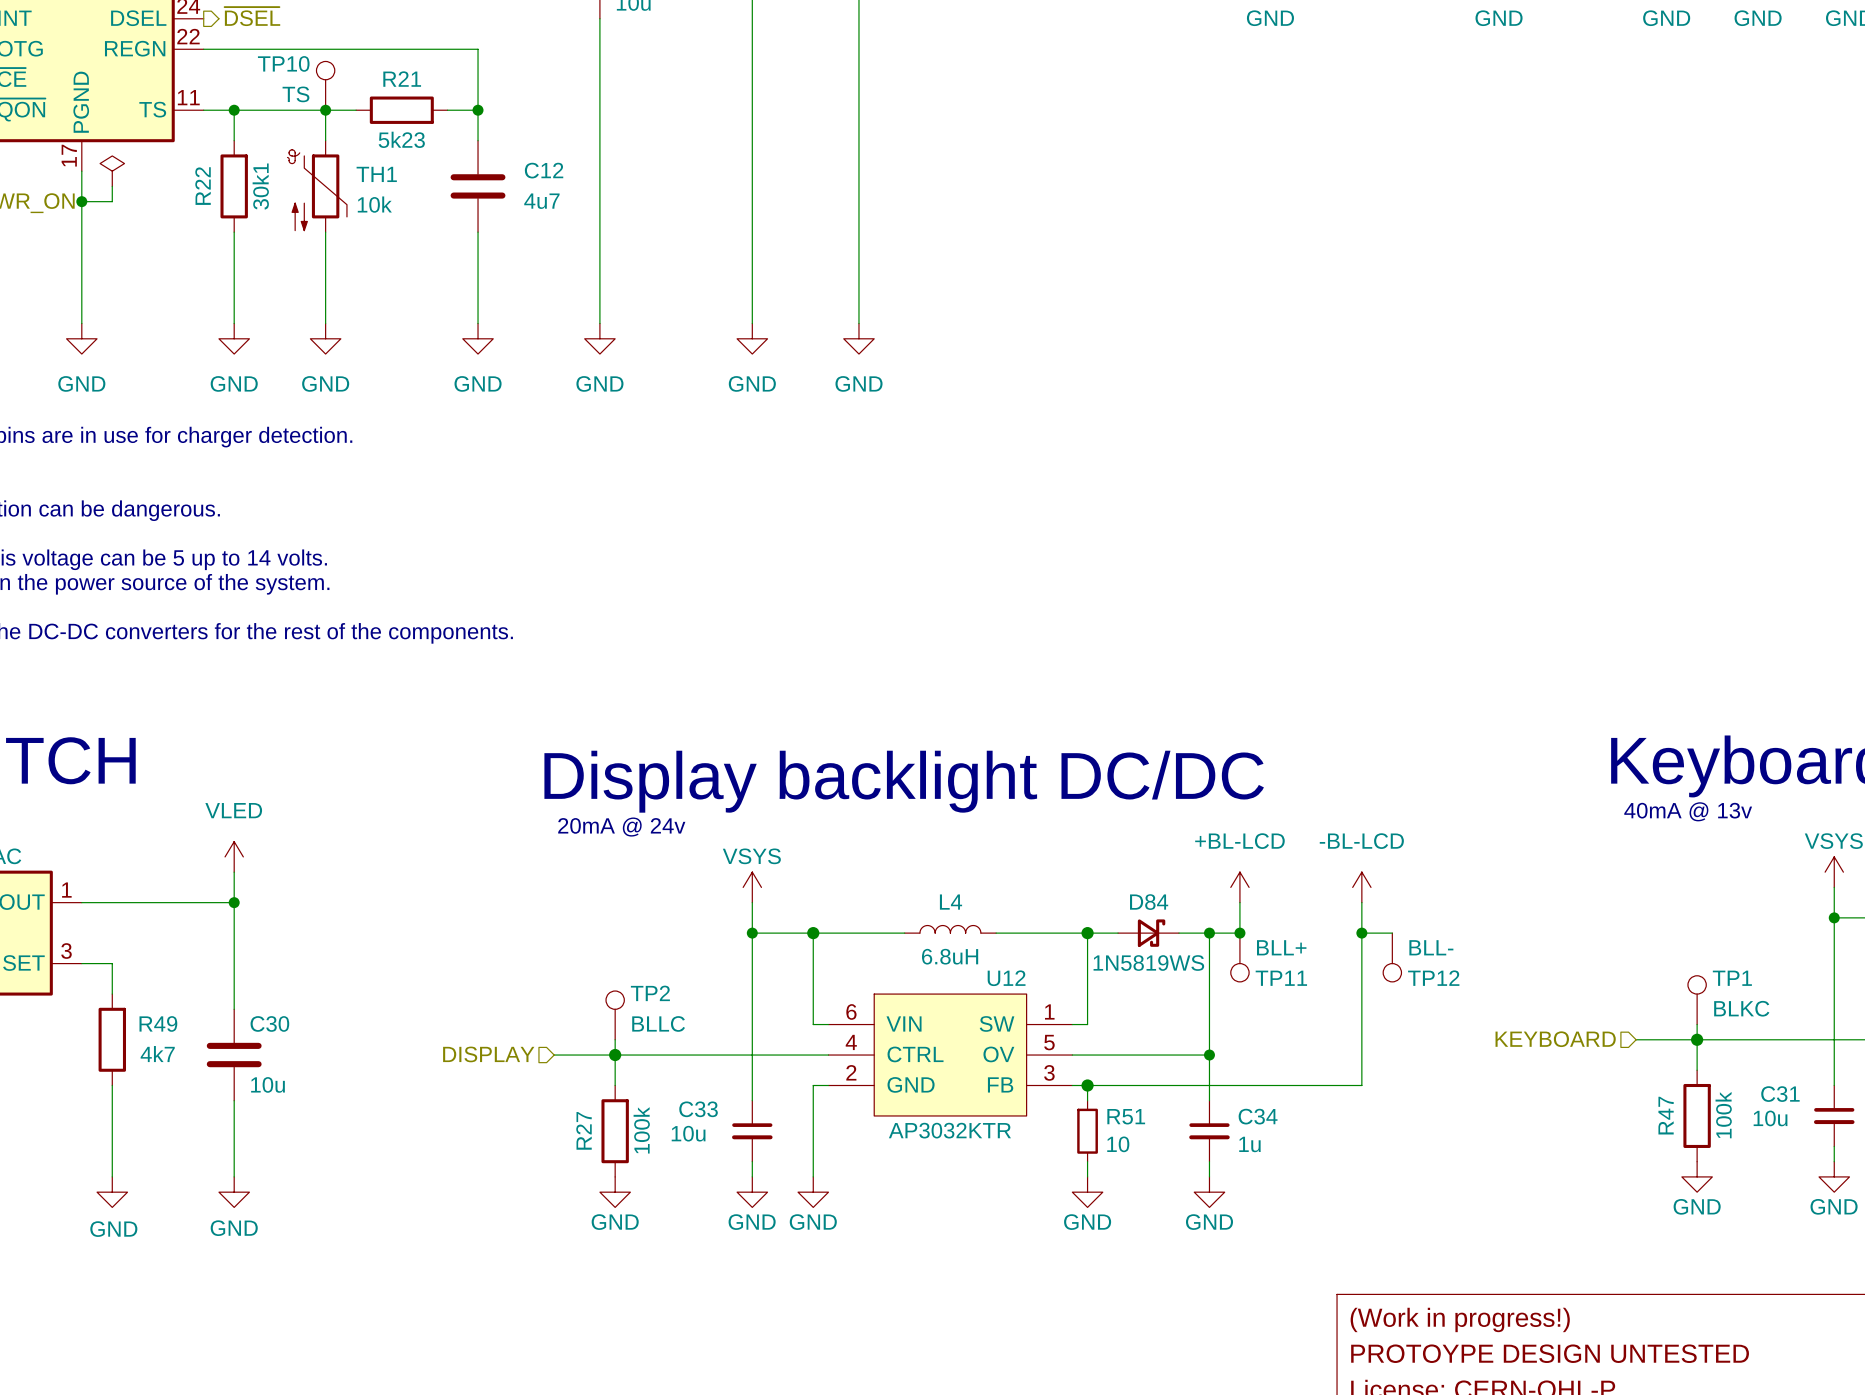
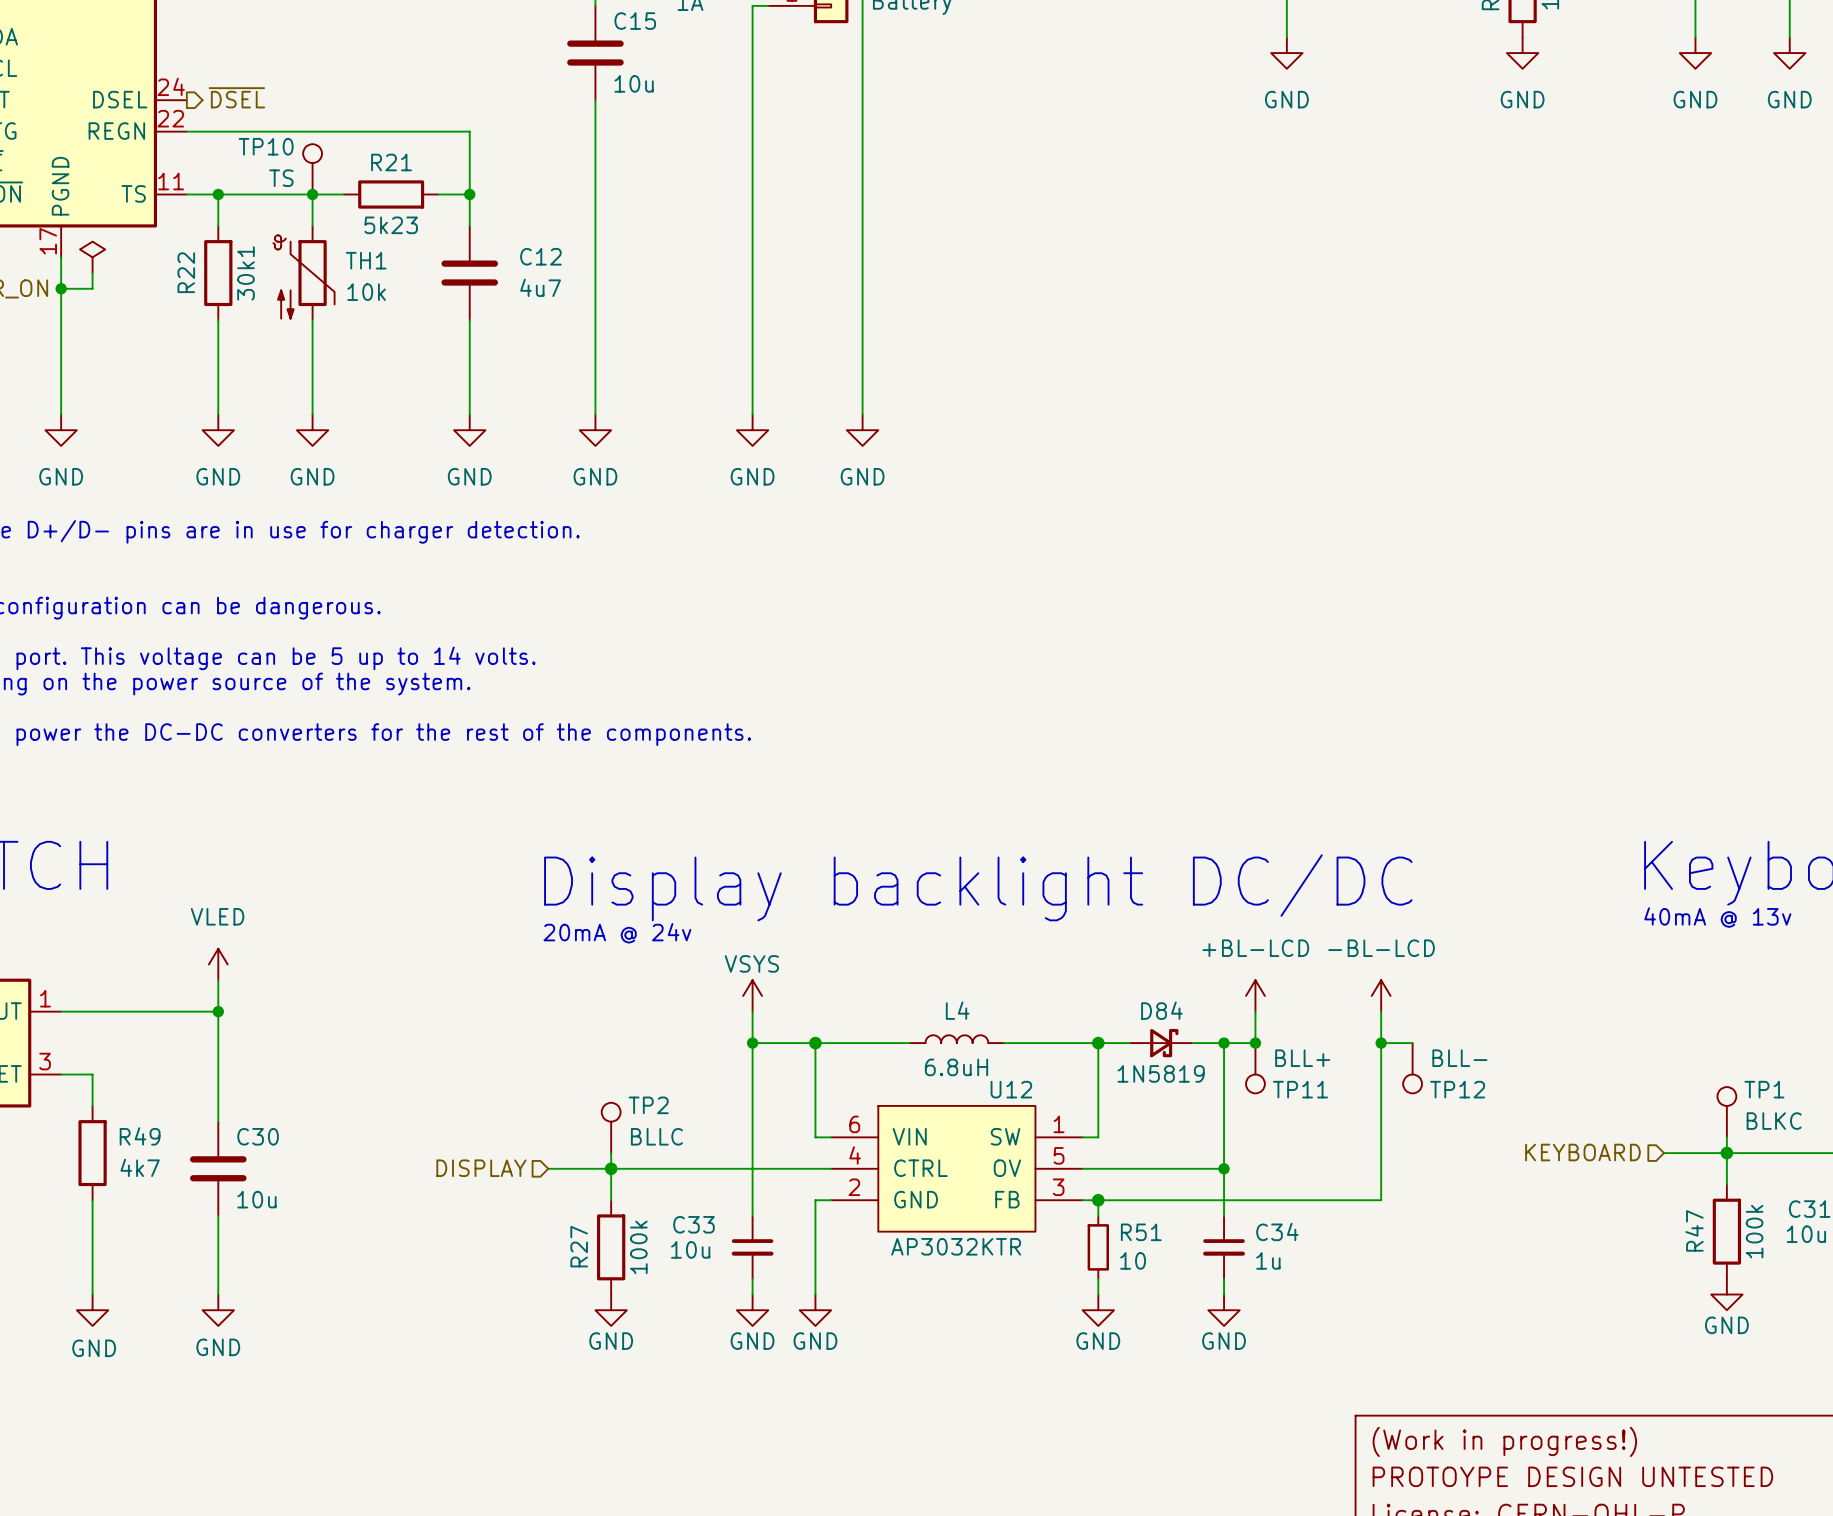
D84 value: 1N5819WS (1148, 963) -> 1N5819 (1161, 1073)

